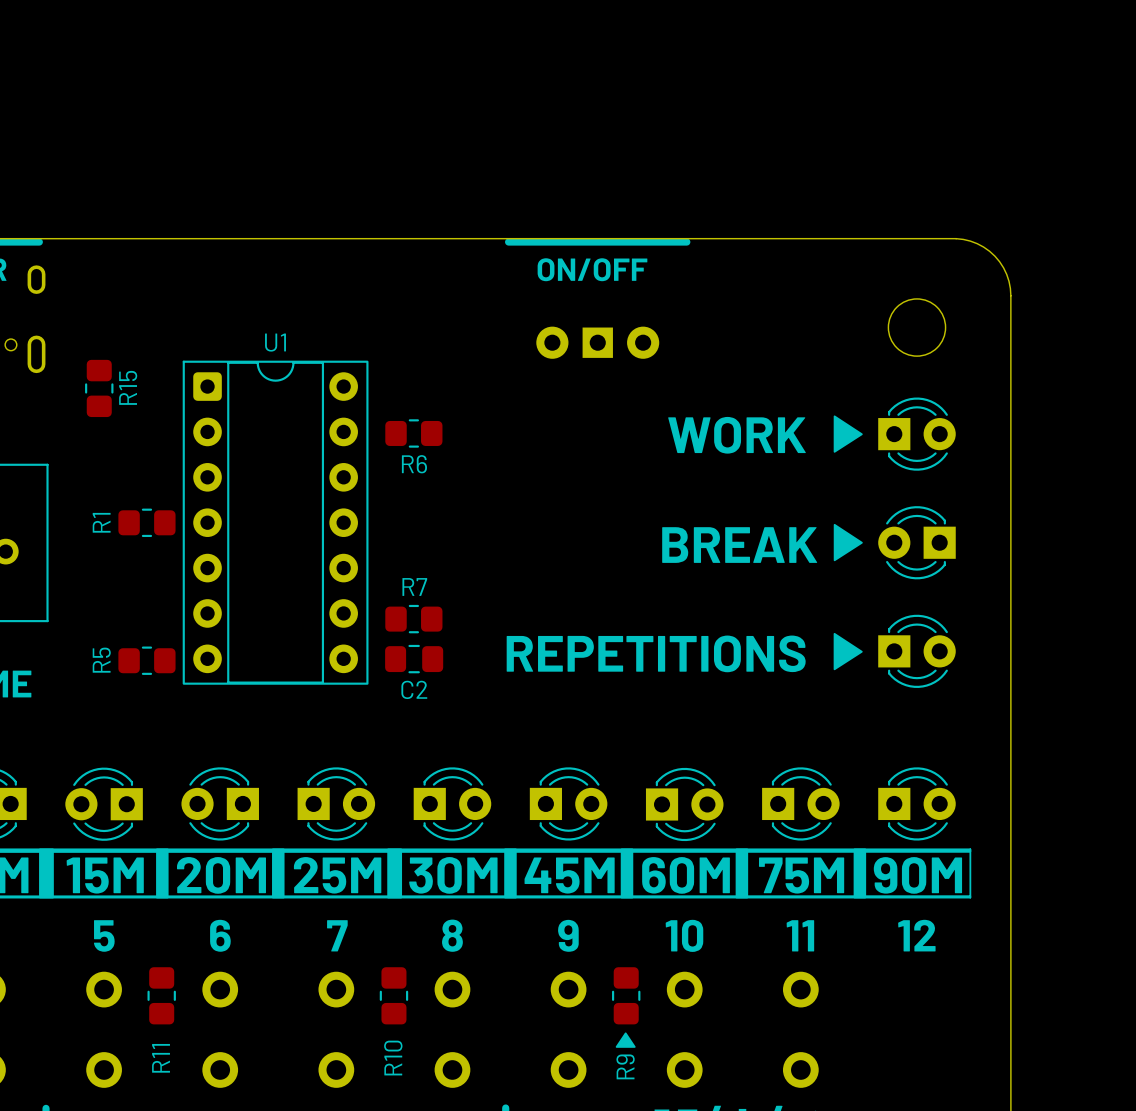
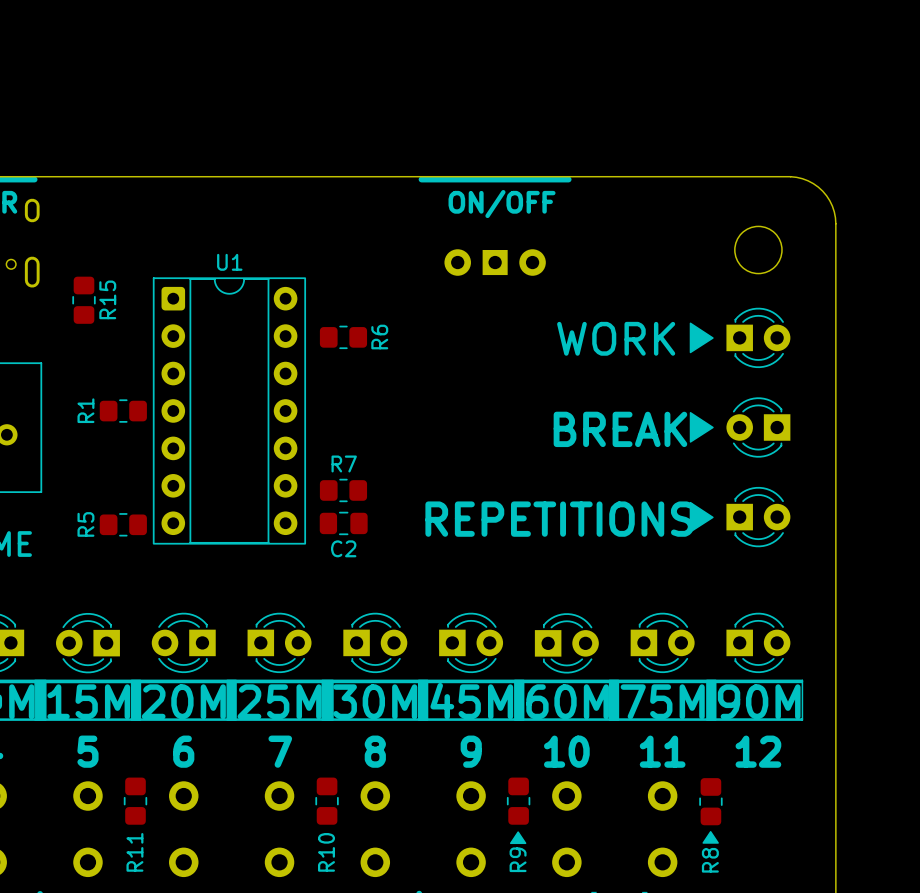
R6 name rotation: 0° (414, 464) -> 90° counterclockwise (379, 337)
R6 name position: R6 (414, 464) -> R6 (379, 337)
R8: none -> (710, 801)
drawing: none -> [702, 831, 719, 844]

